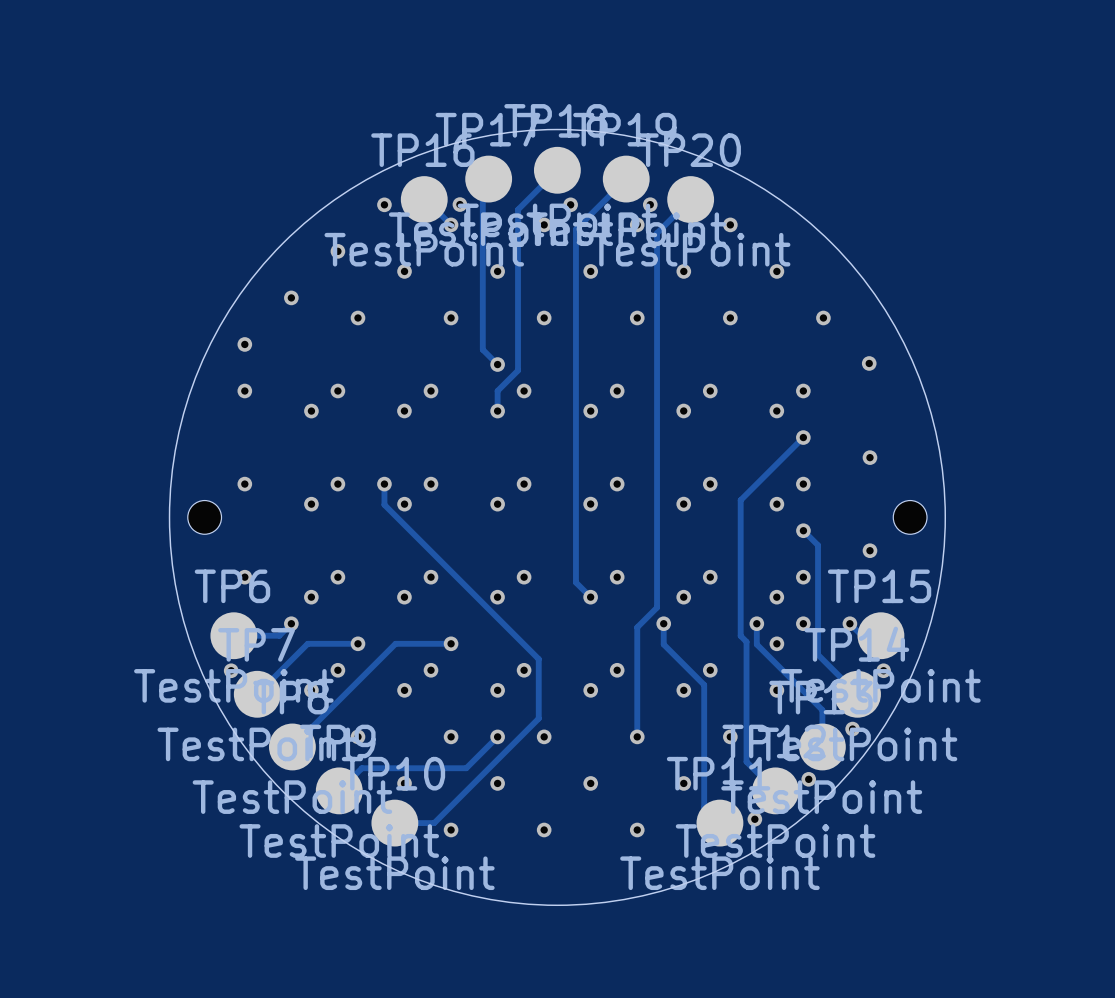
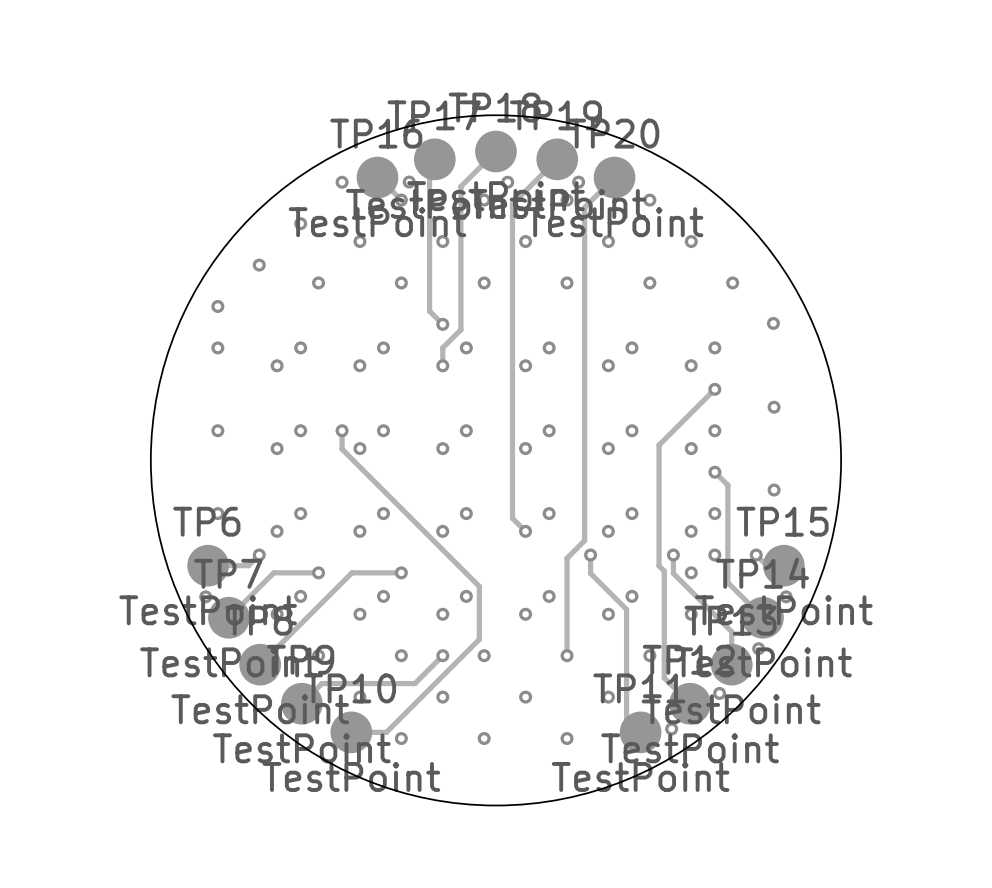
part: (204, 517) -> none
part: (910, 517) -> none

